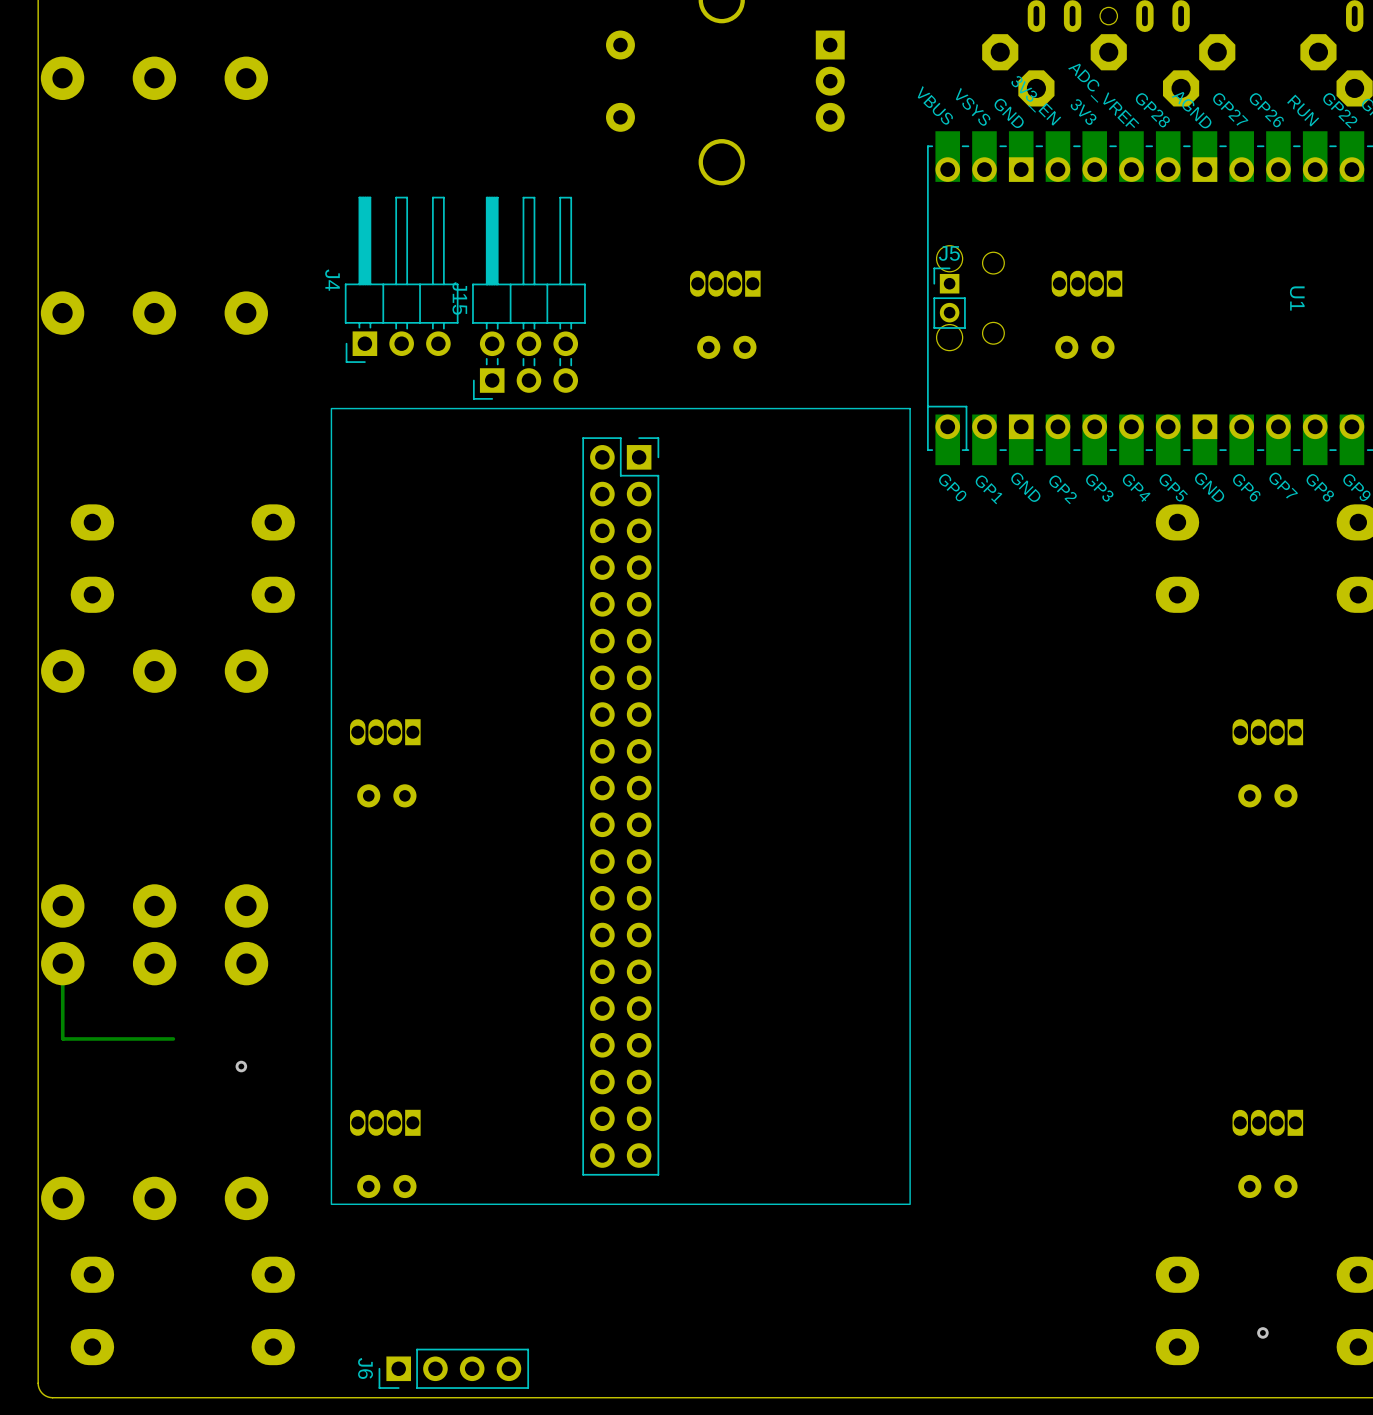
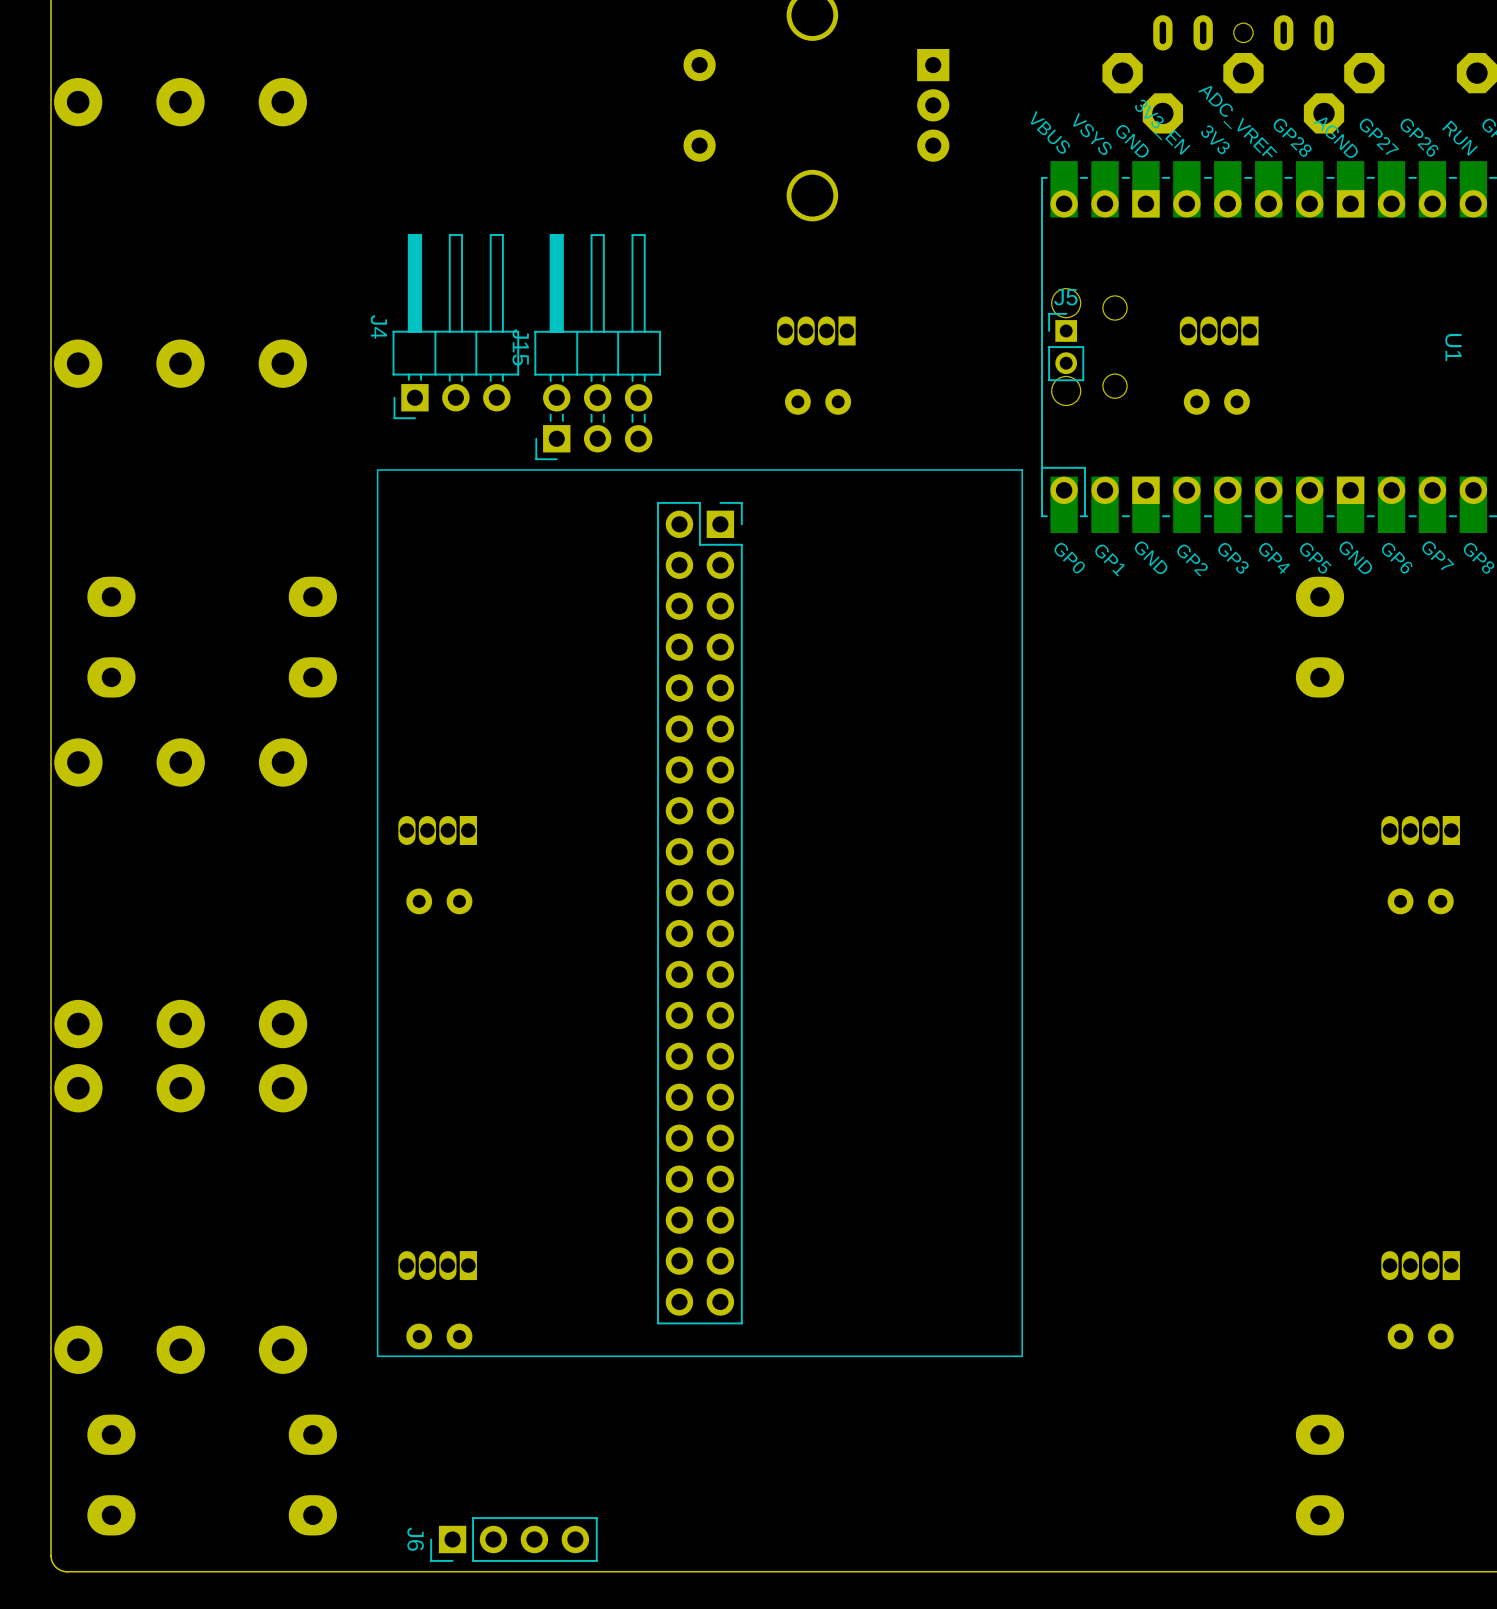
track: (62, 963) (63, 1038) (173, 1038) -> none
via: (241, 1066) -> none
via: (1262, 1332) -> none

